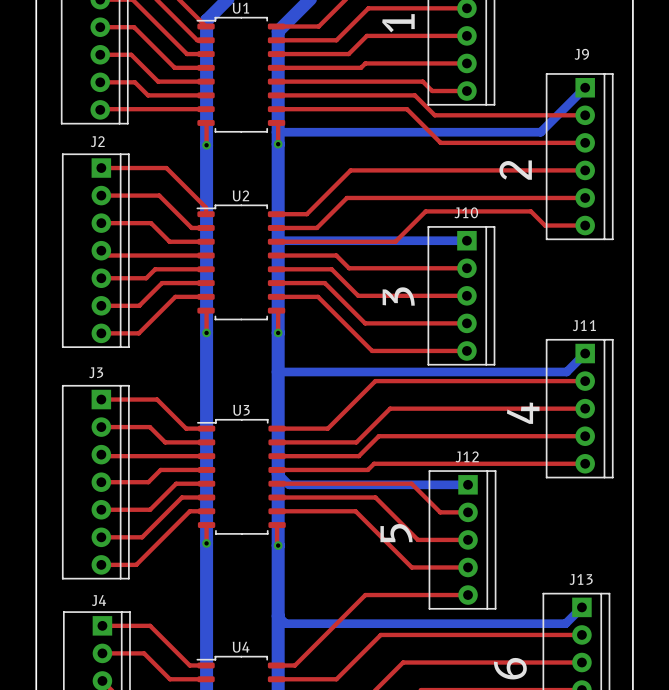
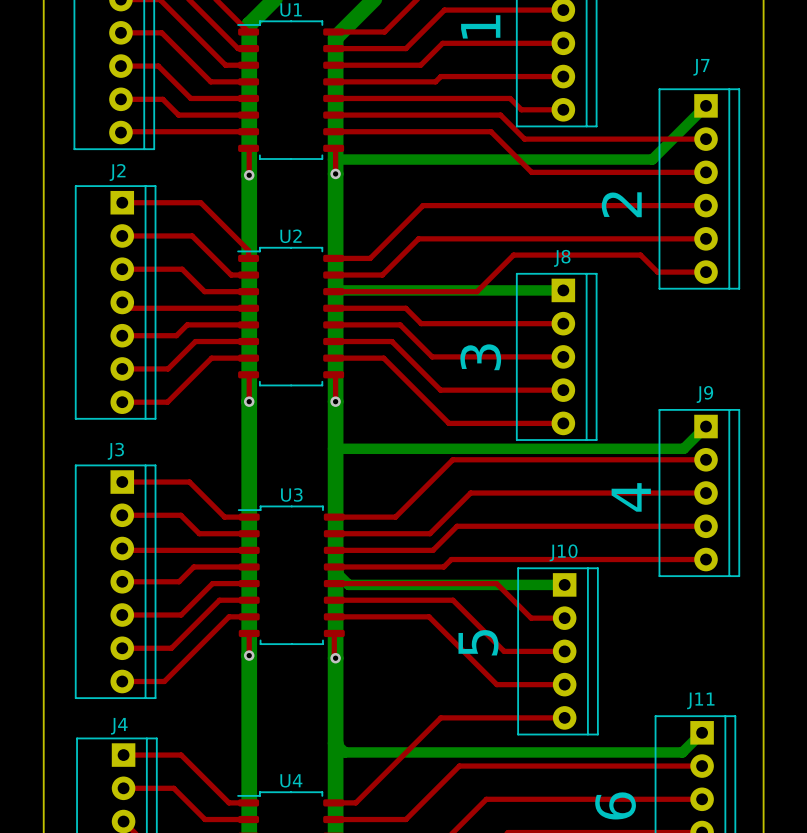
J9 name: J9 (581, 54) -> J7 (701, 67)
J10 name: J10 (466, 212) -> J8 (562, 258)
J11 name: J11 (584, 325) -> J9 (704, 394)
J12 name: J12 (467, 456) -> J10 (563, 552)
J13 name: J13 (581, 579) -> J11 (700, 700)

